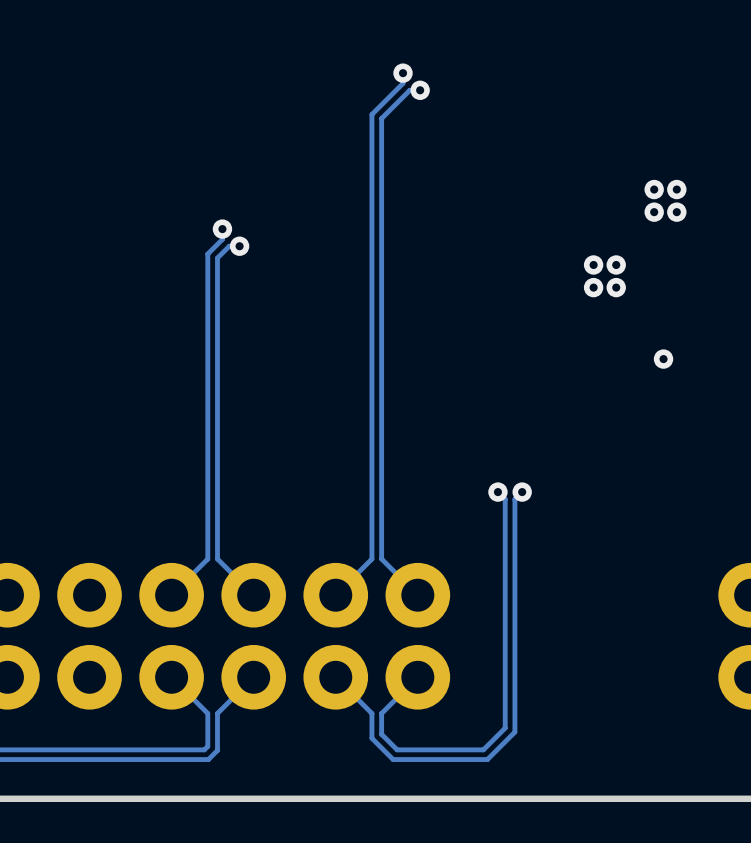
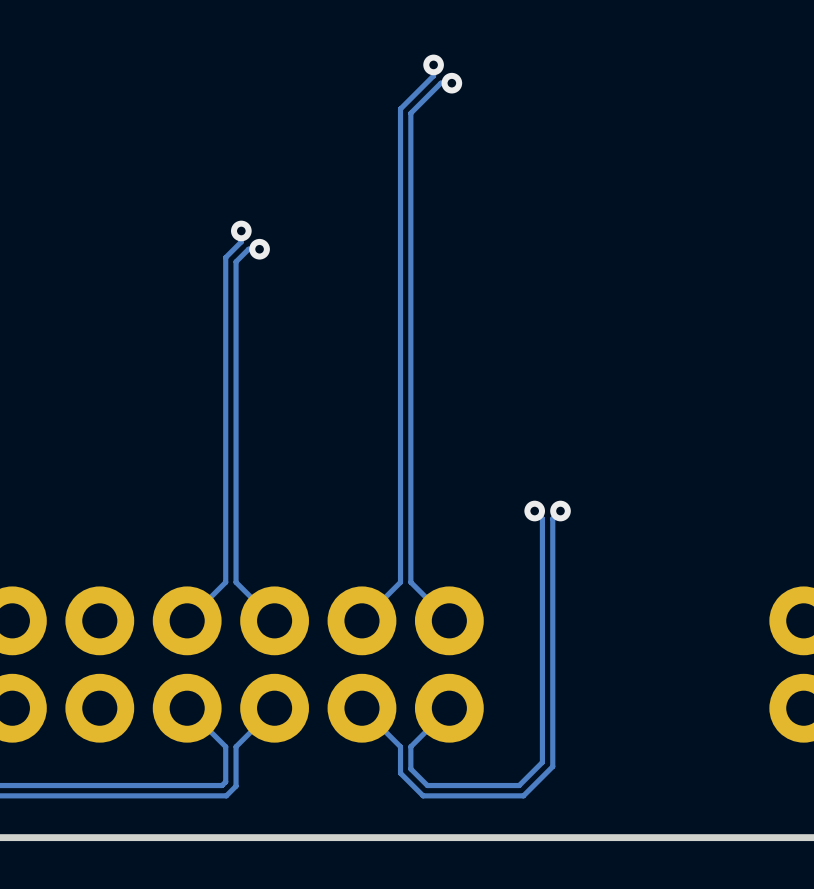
via: (654, 189) -> none
via: (676, 189) -> none
via: (654, 212) -> none
via: (676, 212) -> none
via: (593, 264) -> none
via: (616, 264) -> none
via: (593, 287) -> none
via: (616, 287) -> none
via: (663, 359) -> none

